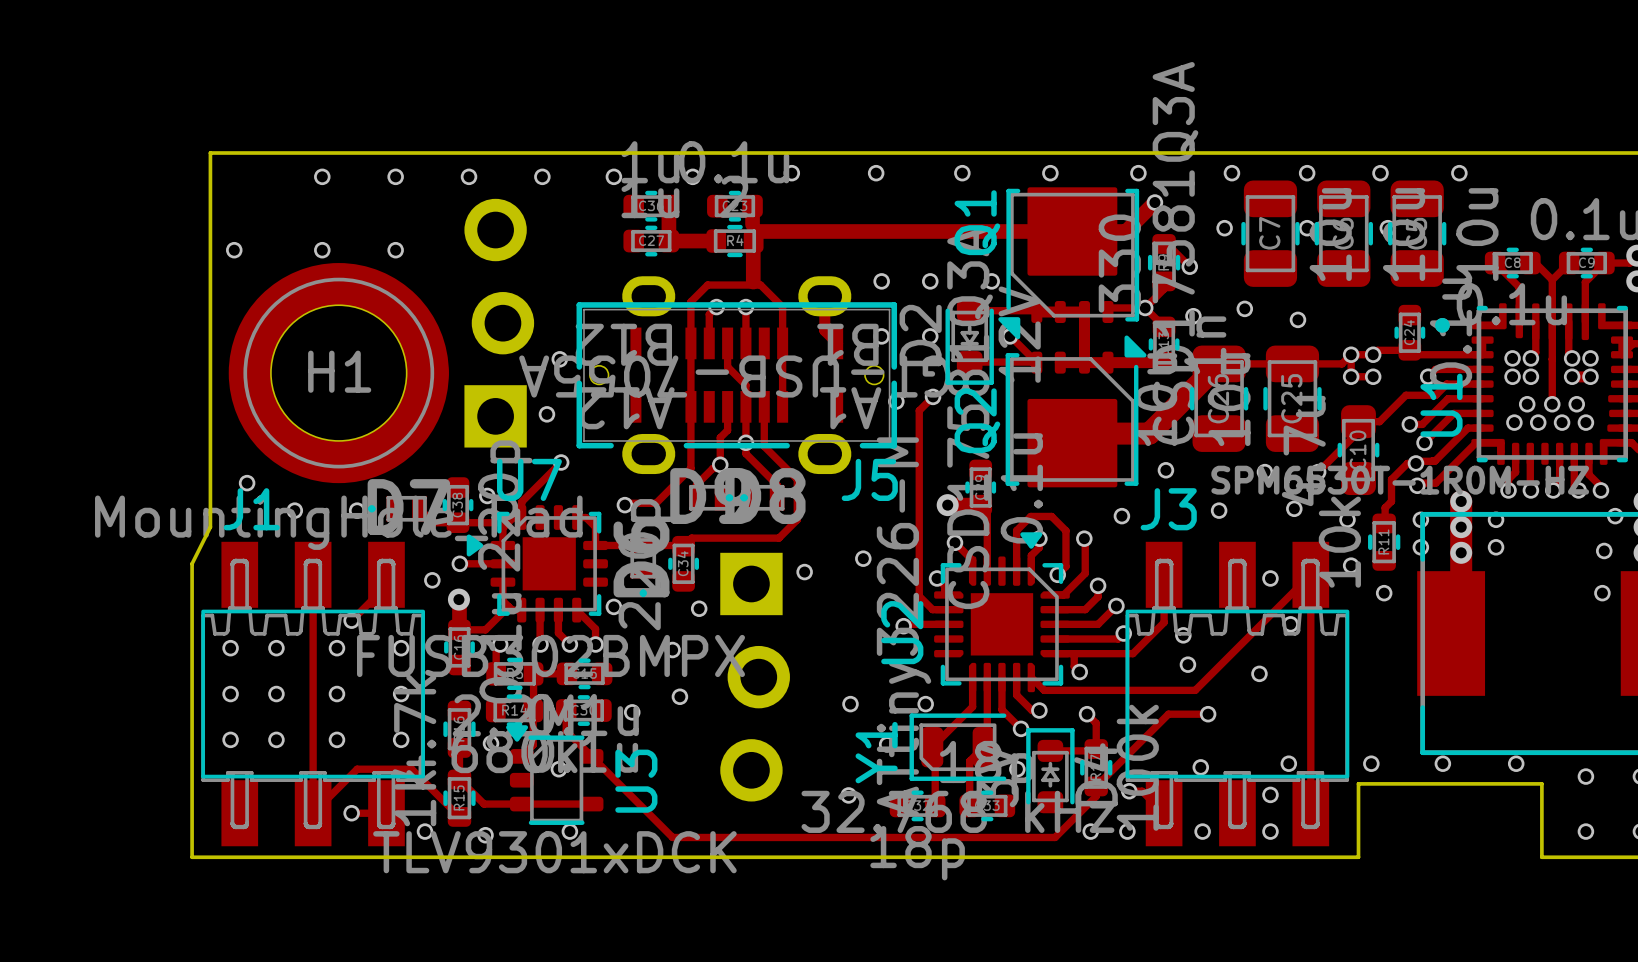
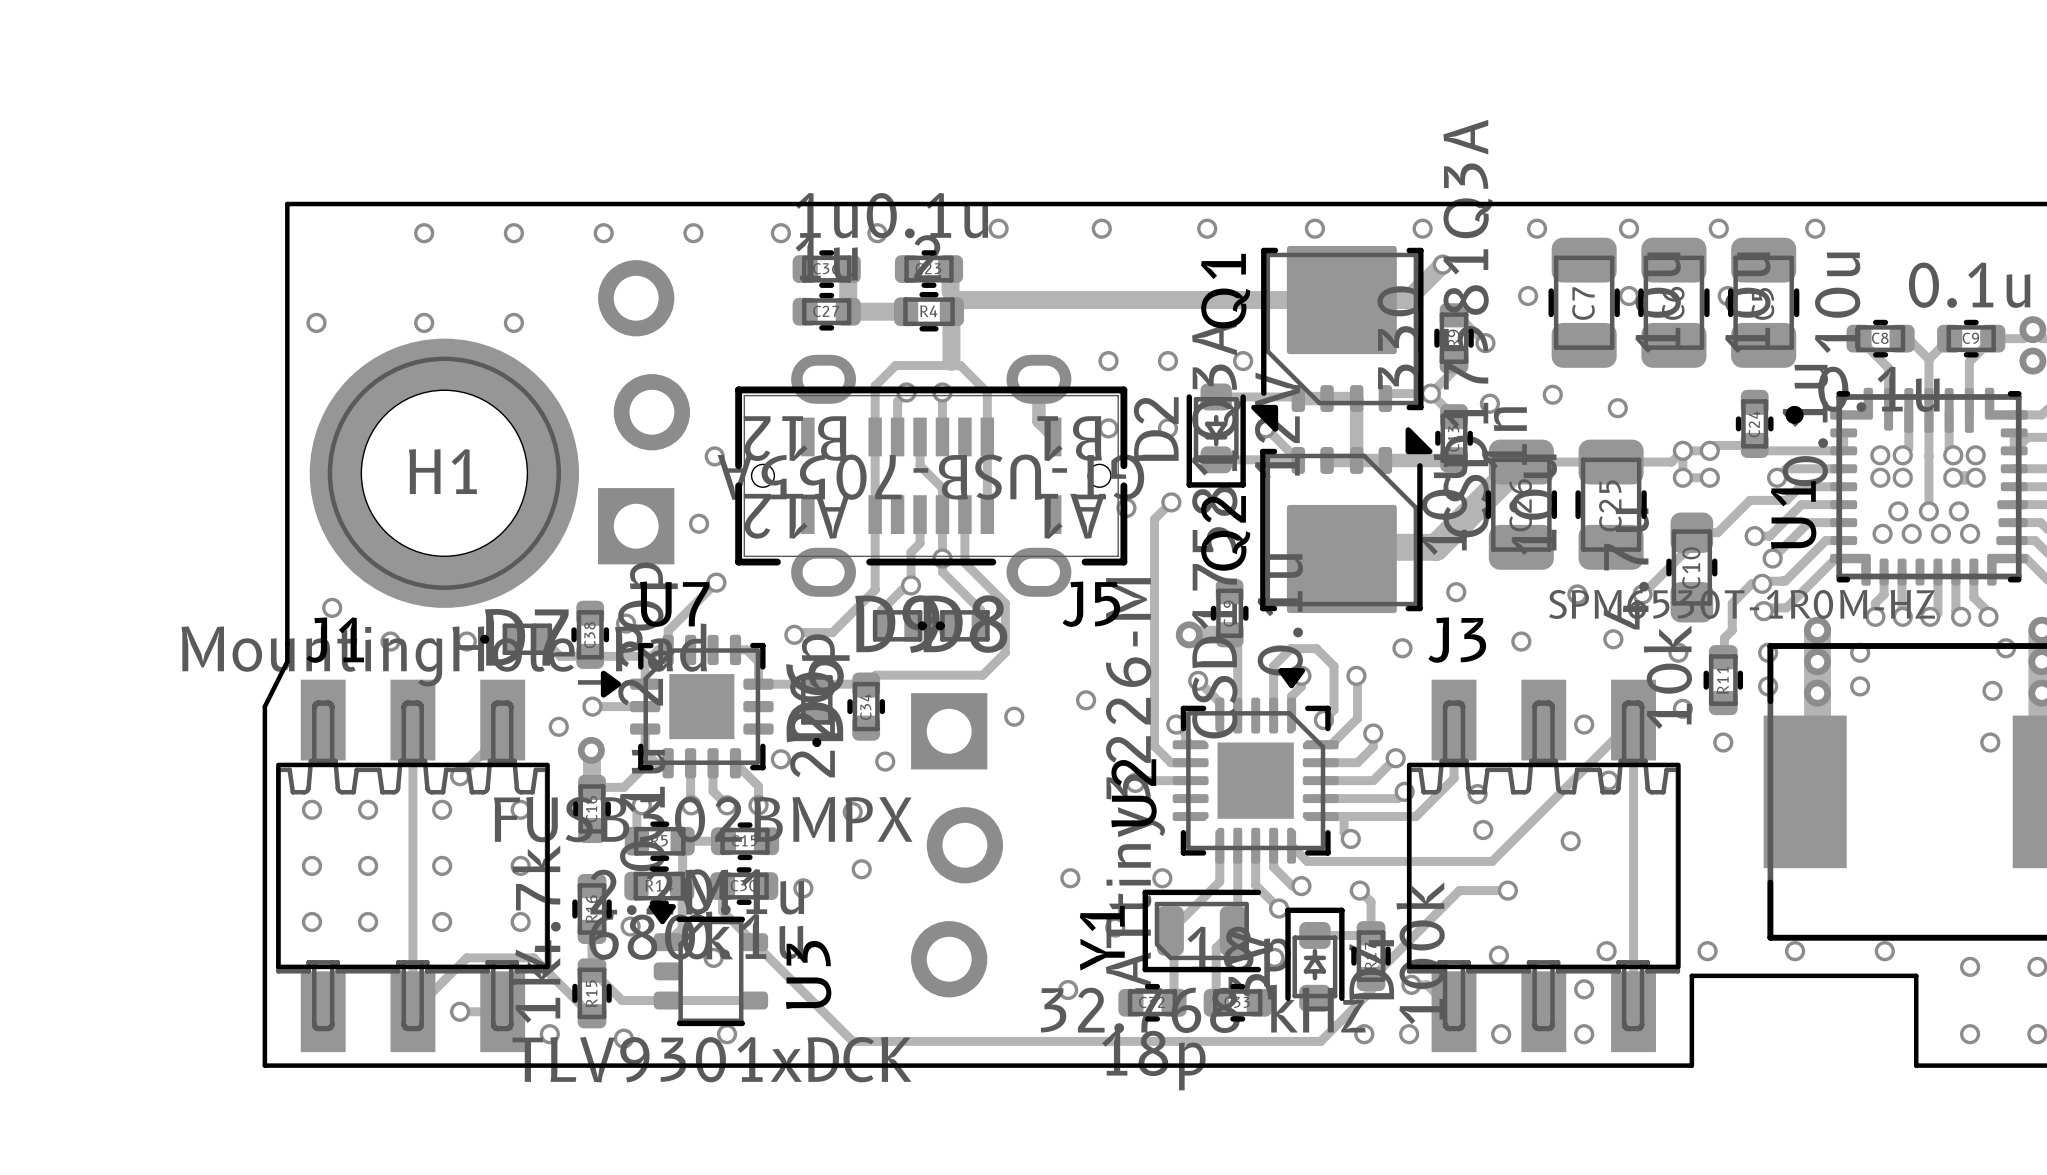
part footprint: [464, 198, 535, 448] -> [598, 260, 691, 565]
part footprint: [720, 552, 790, 802] -> [911, 693, 1004, 998]

